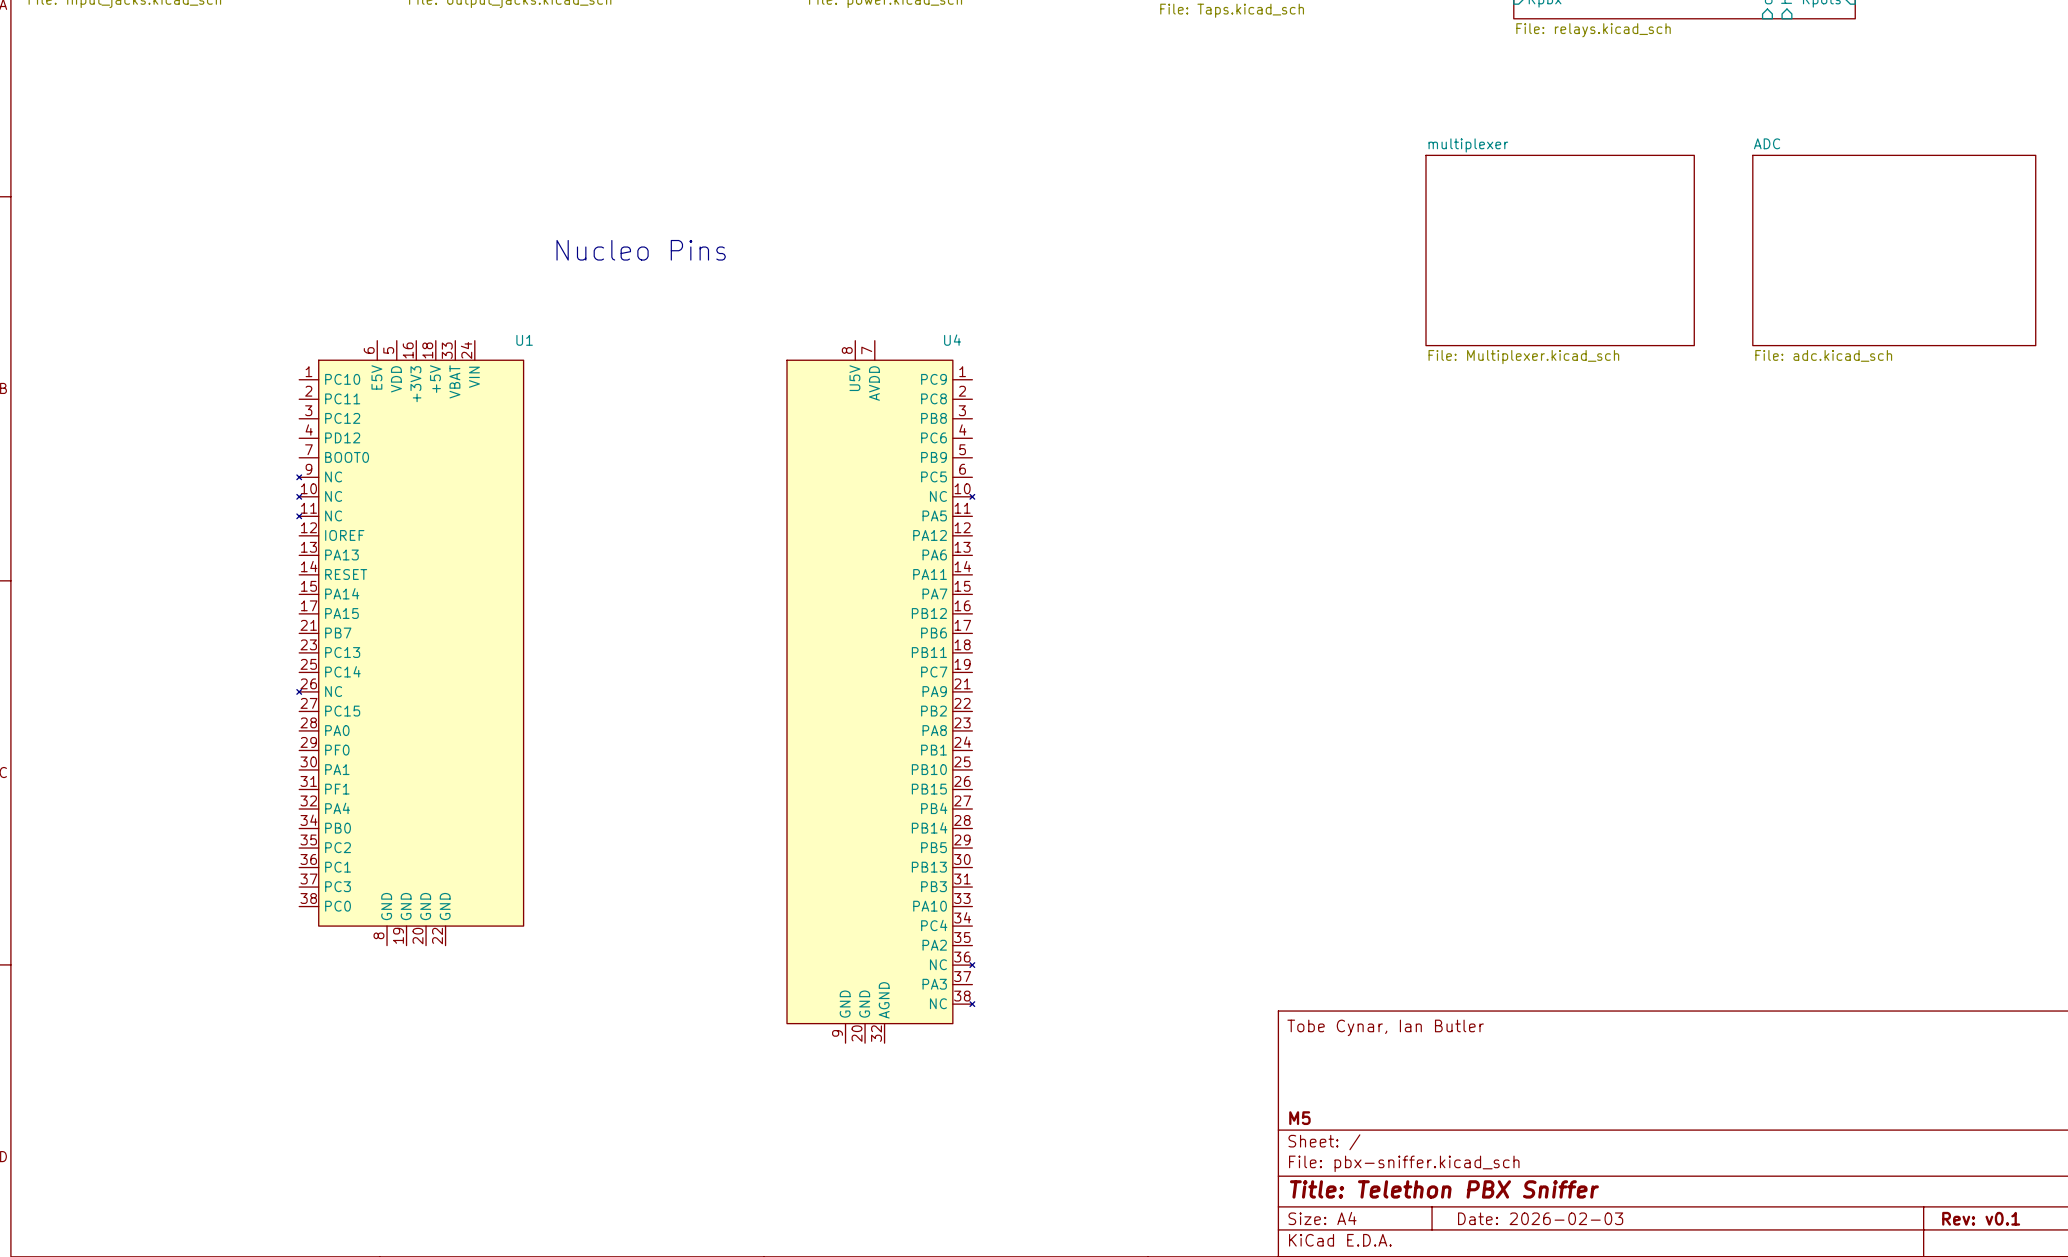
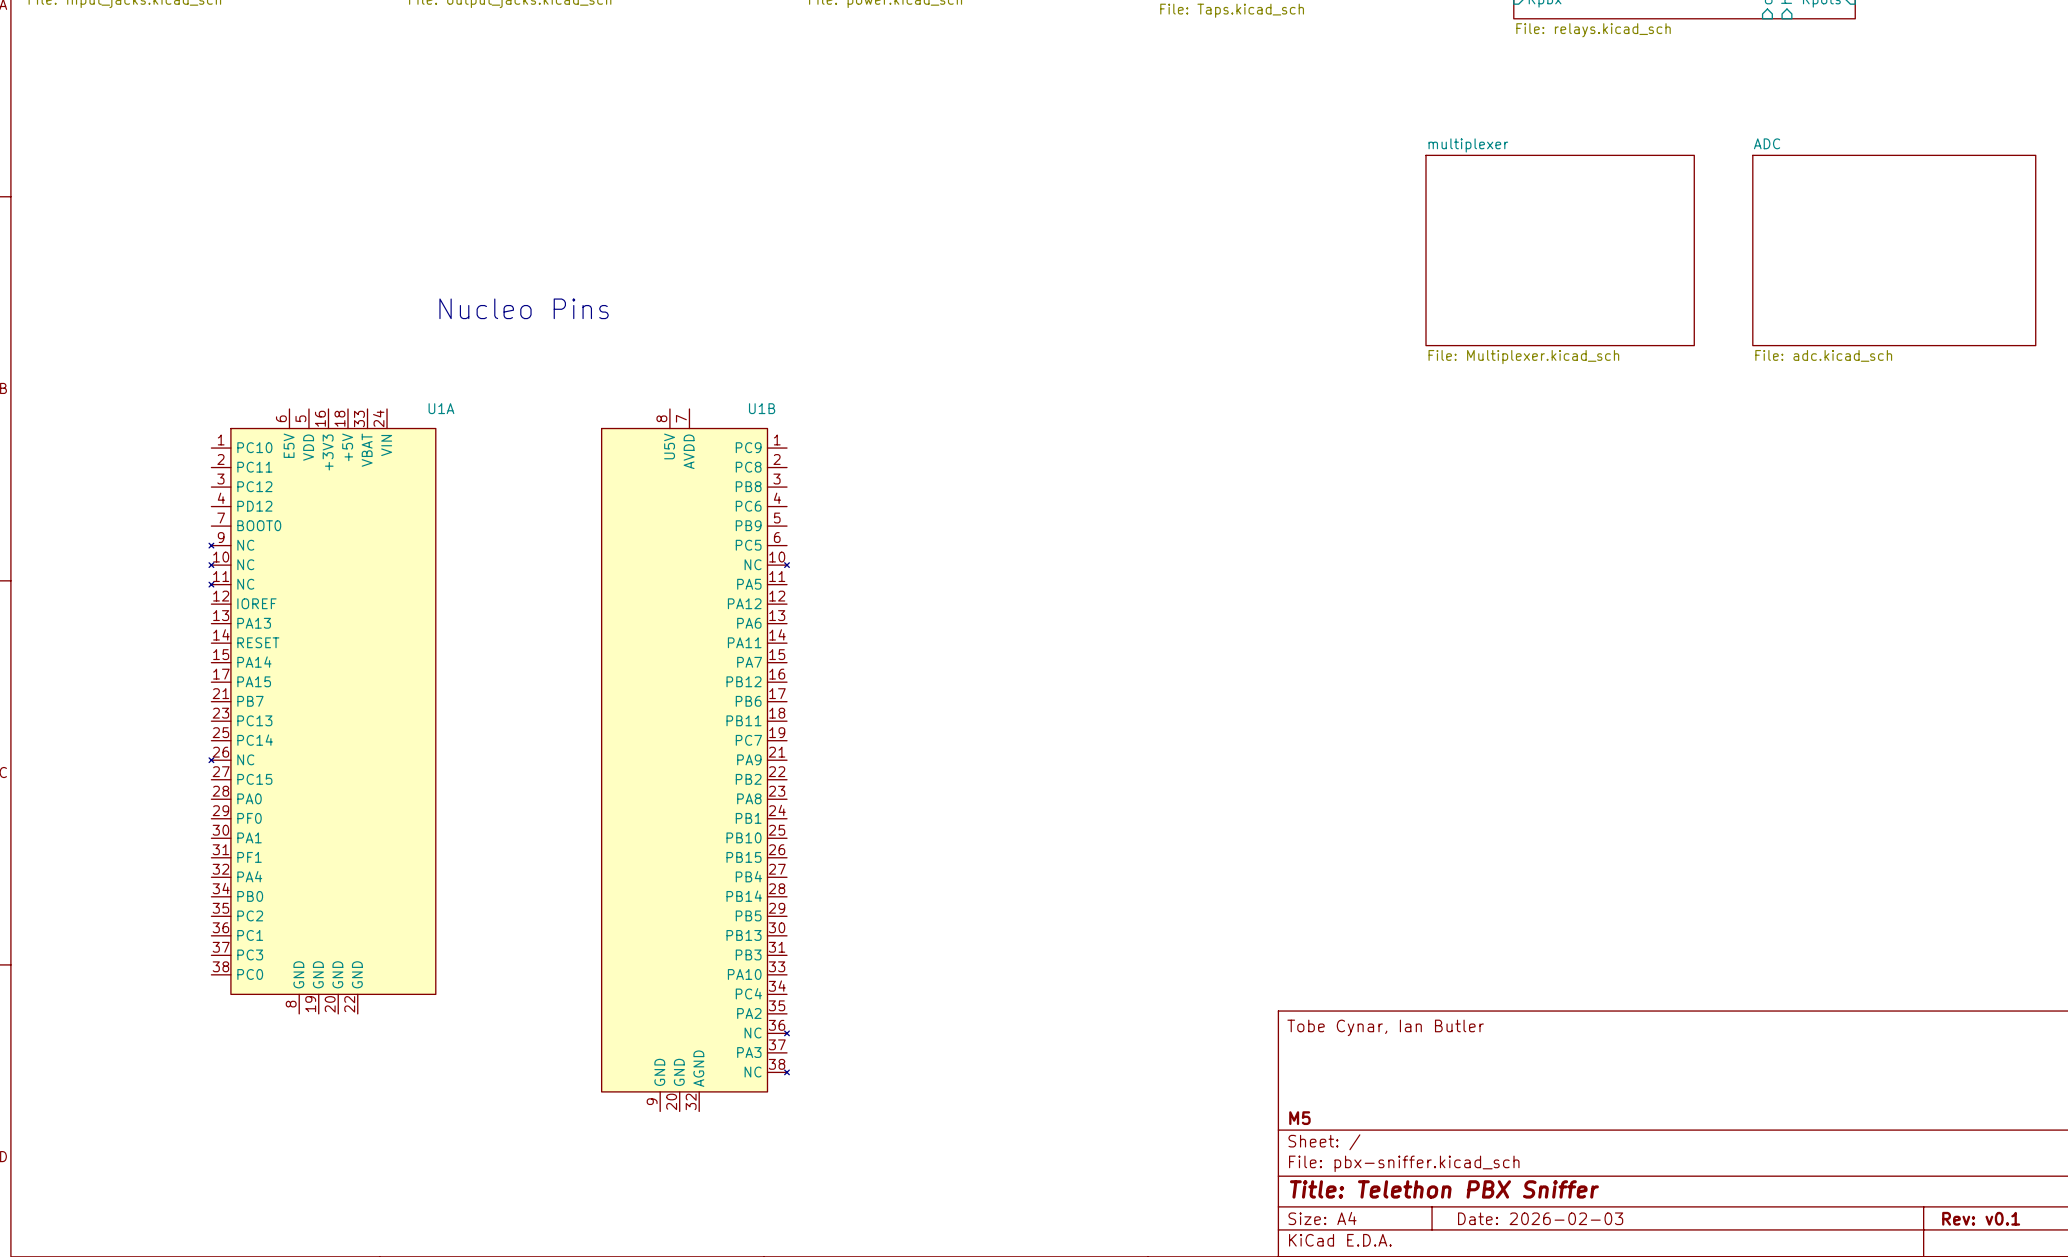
text position: Nucleo Pins (641, 250) -> Nucleo Pins (524, 308)
U1: (410, 643) -> none
U4: (880, 691) -> none
U1A: none -> (322, 711)
U1B: none -> (695, 760)

